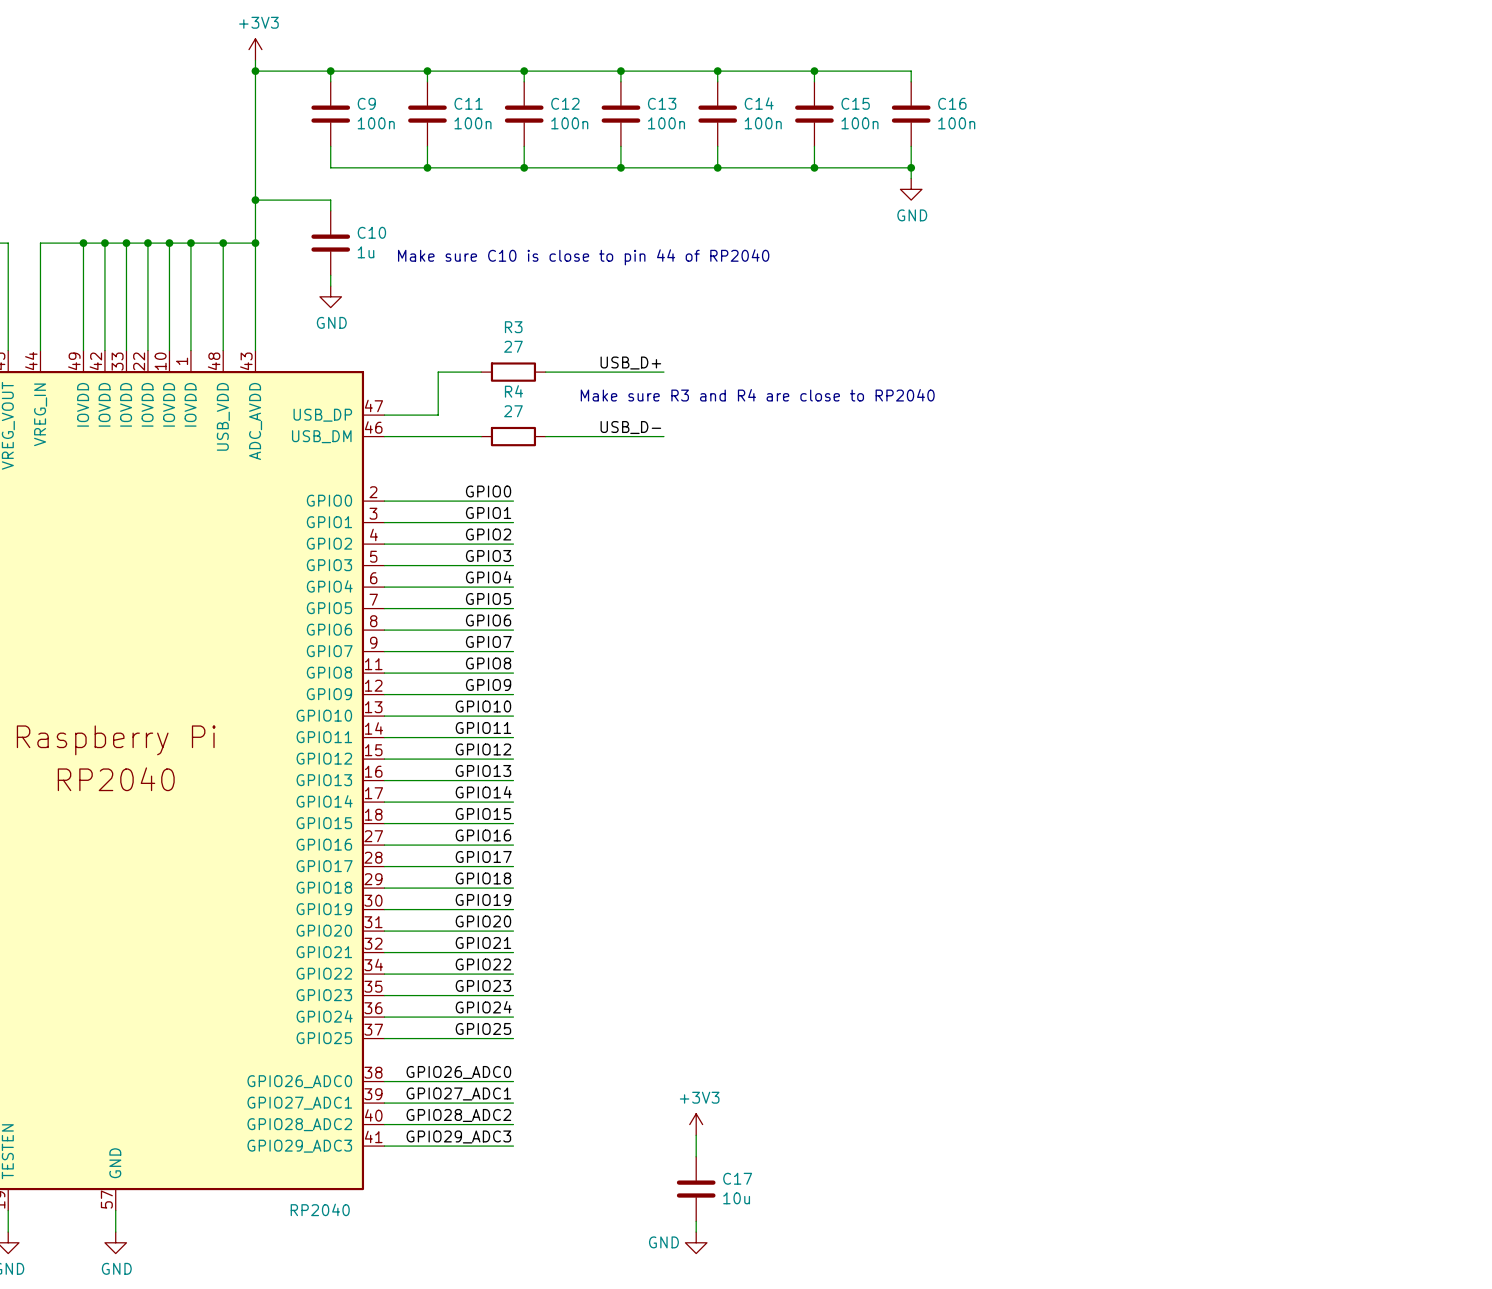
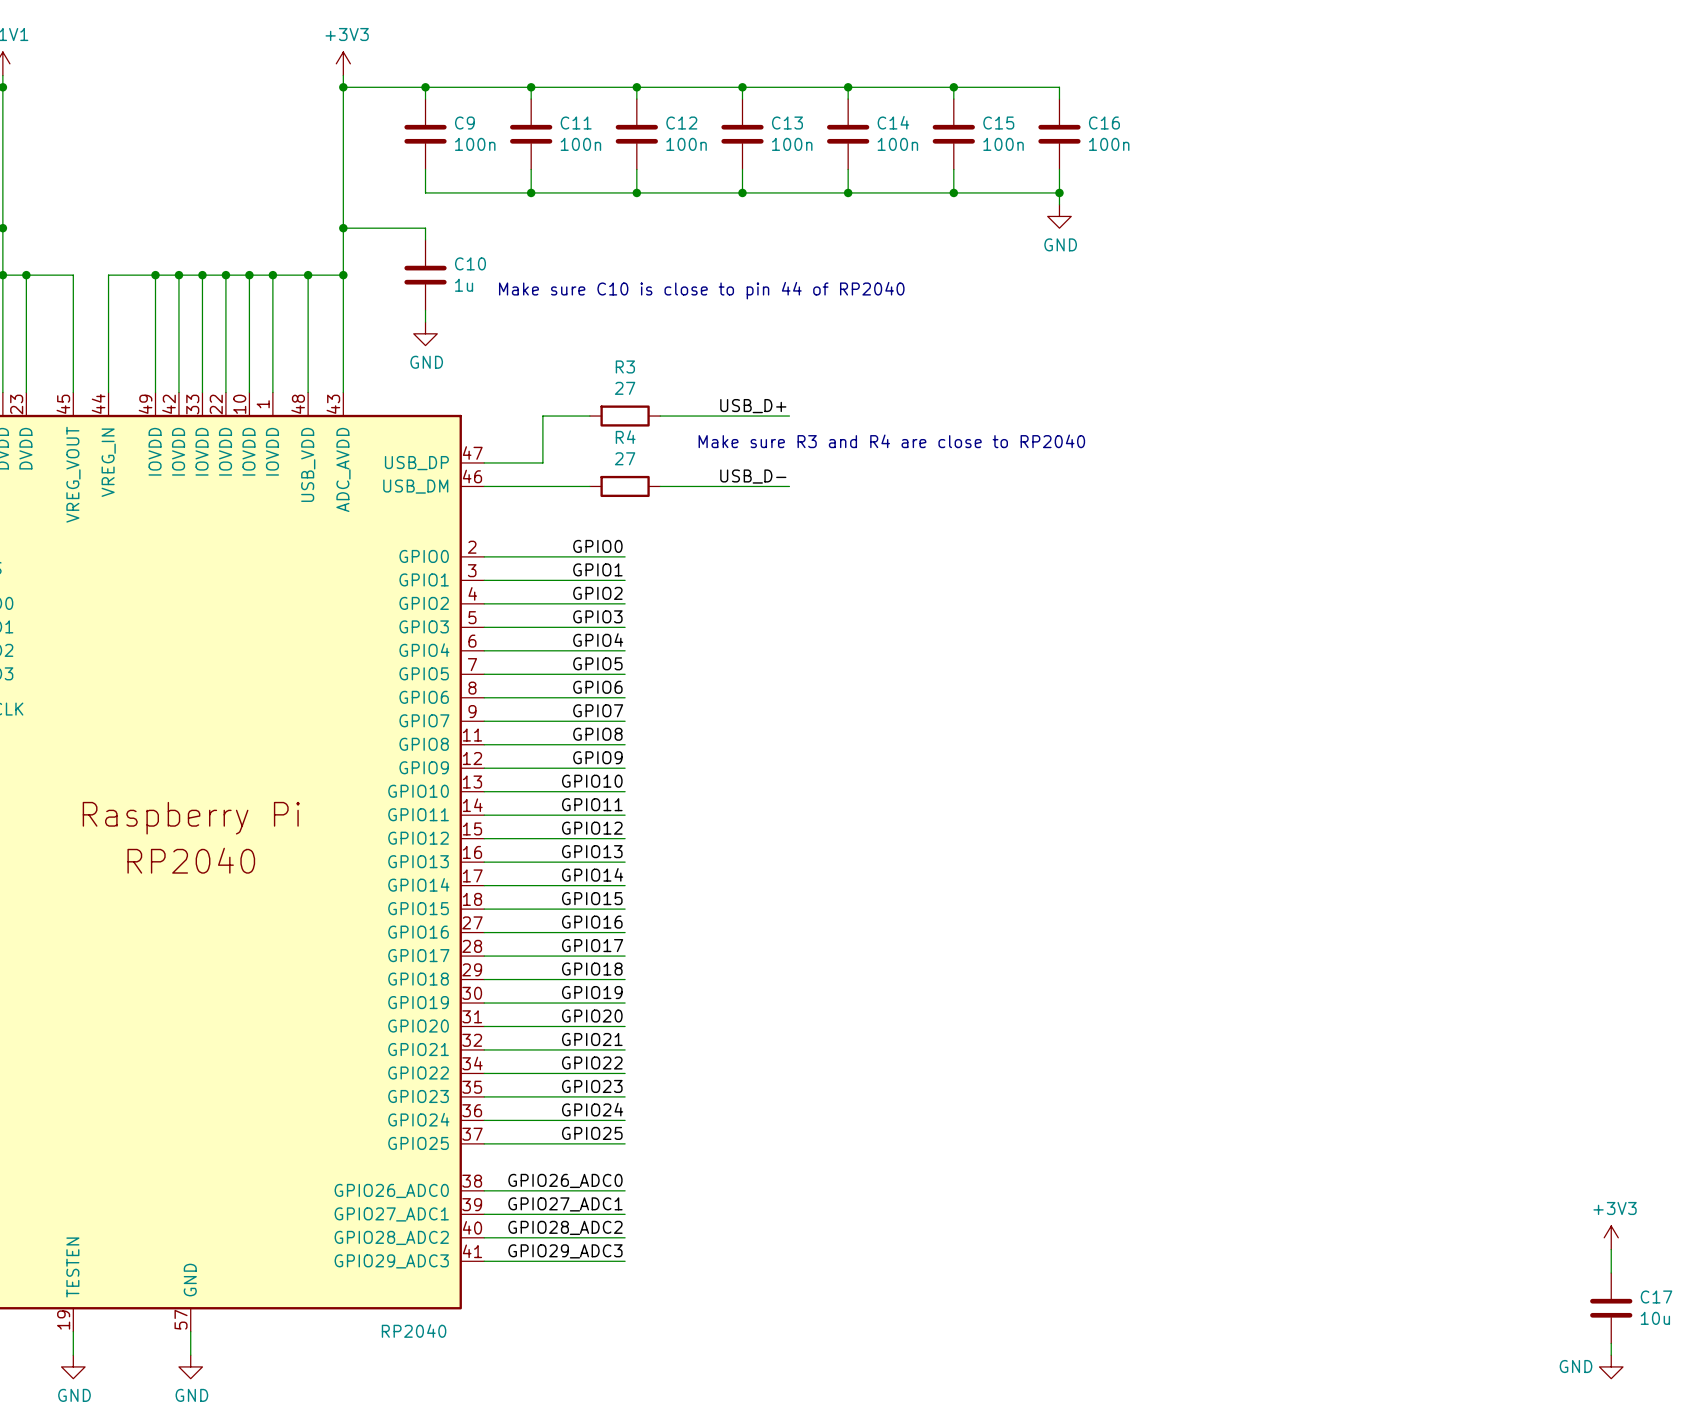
power symbol: +3V3 (696, 1124) -> none
power symbol: none -> +3V3 (1611, 1237)
wire: (696, 1135) (696, 1156) -> none
wire: none -> (1611, 1249) (1611, 1273)
C17 position: (696, 1189) -> (1611, 1308)
wire: (696, 1221) (696, 1232) -> none
wire: none -> (1611, 1343) (1611, 1355)
power symbol: GND (696, 1242) -> none
power symbol: none -> GND (1611, 1366)

